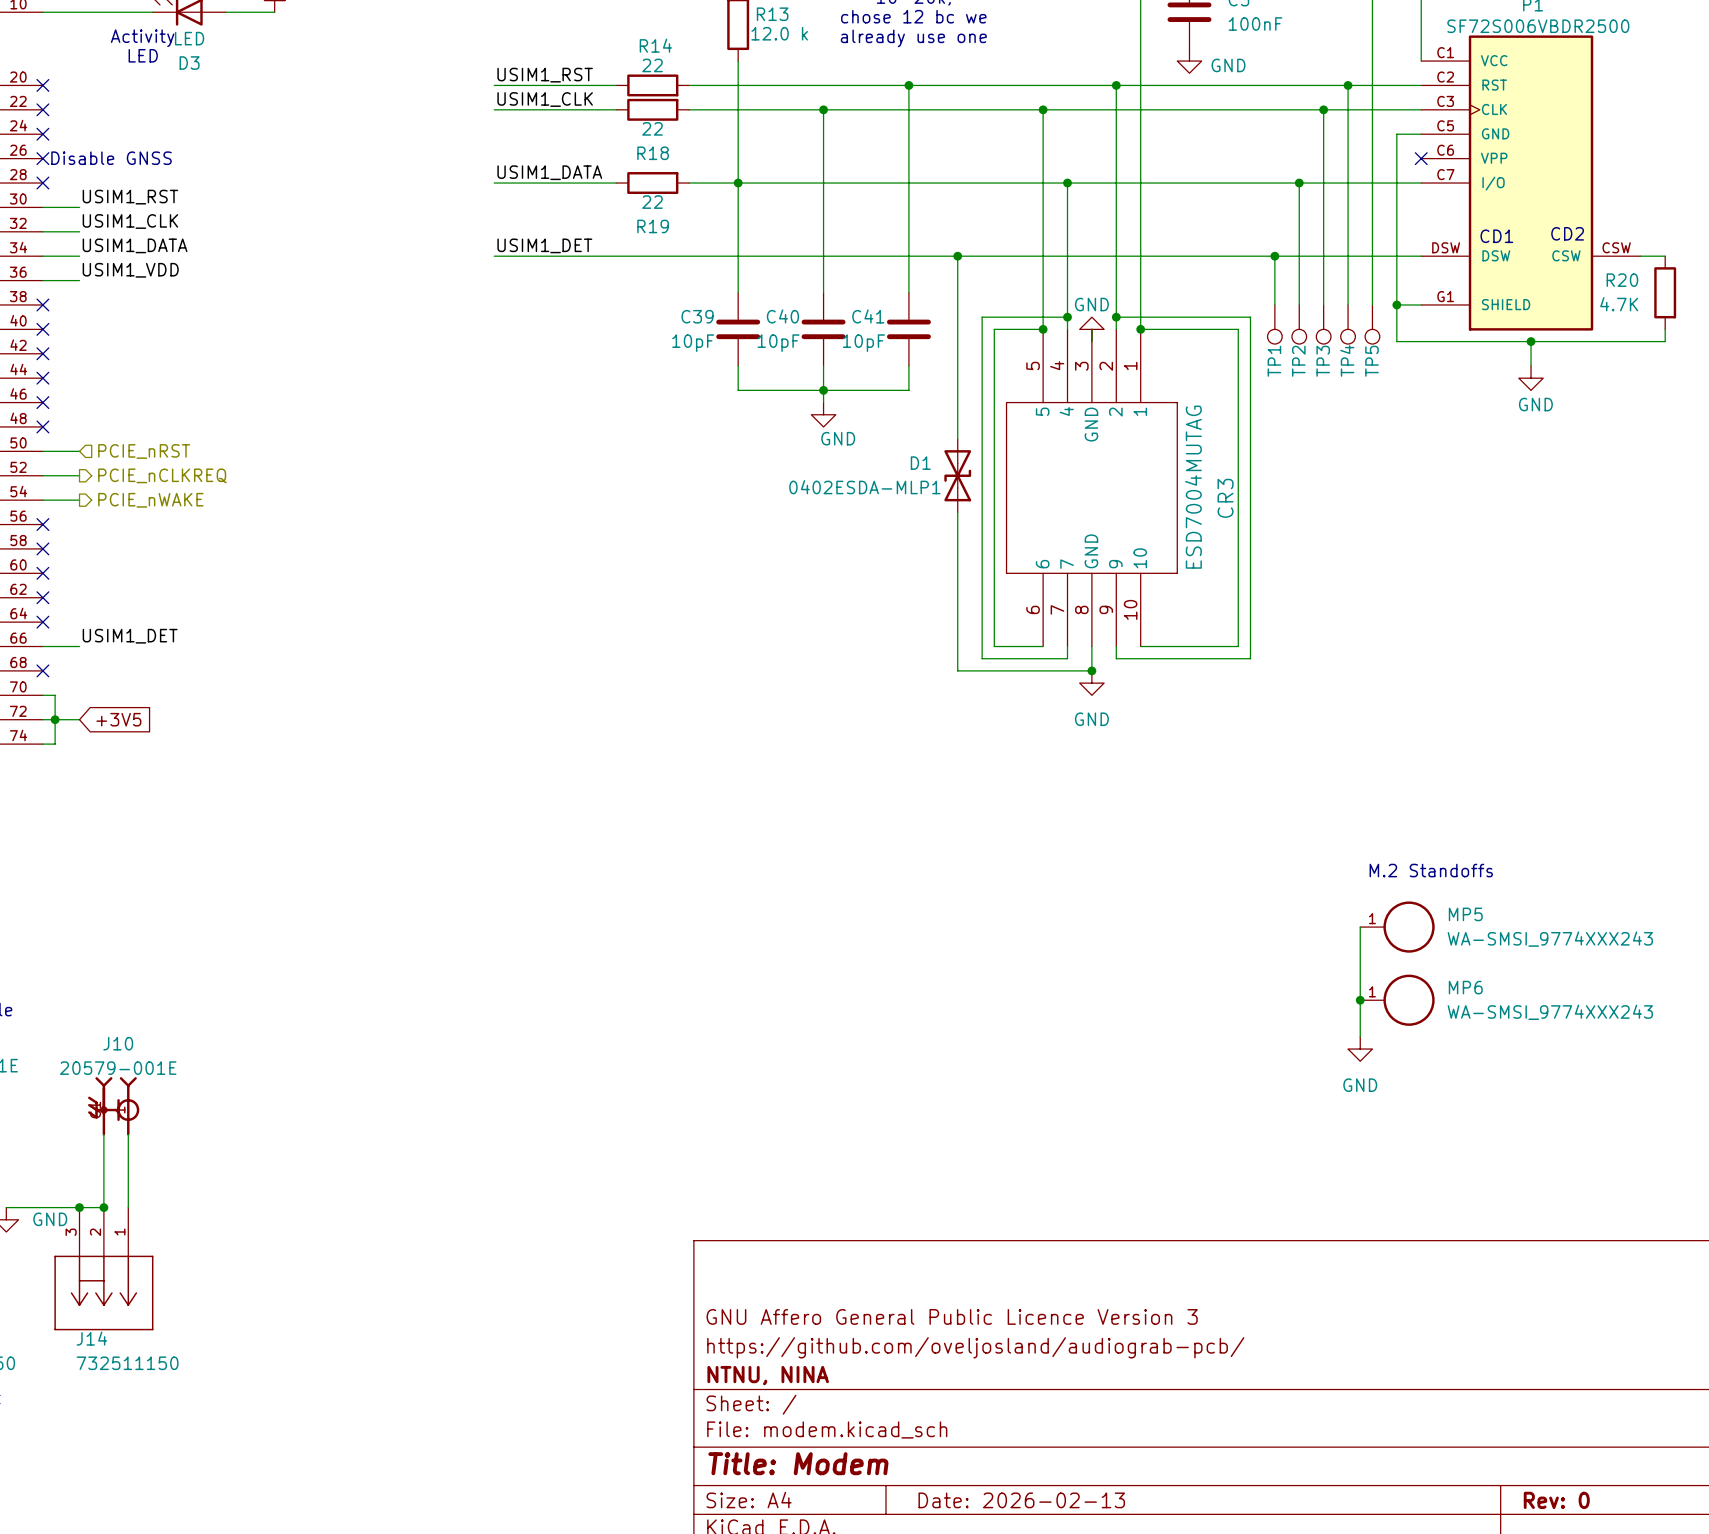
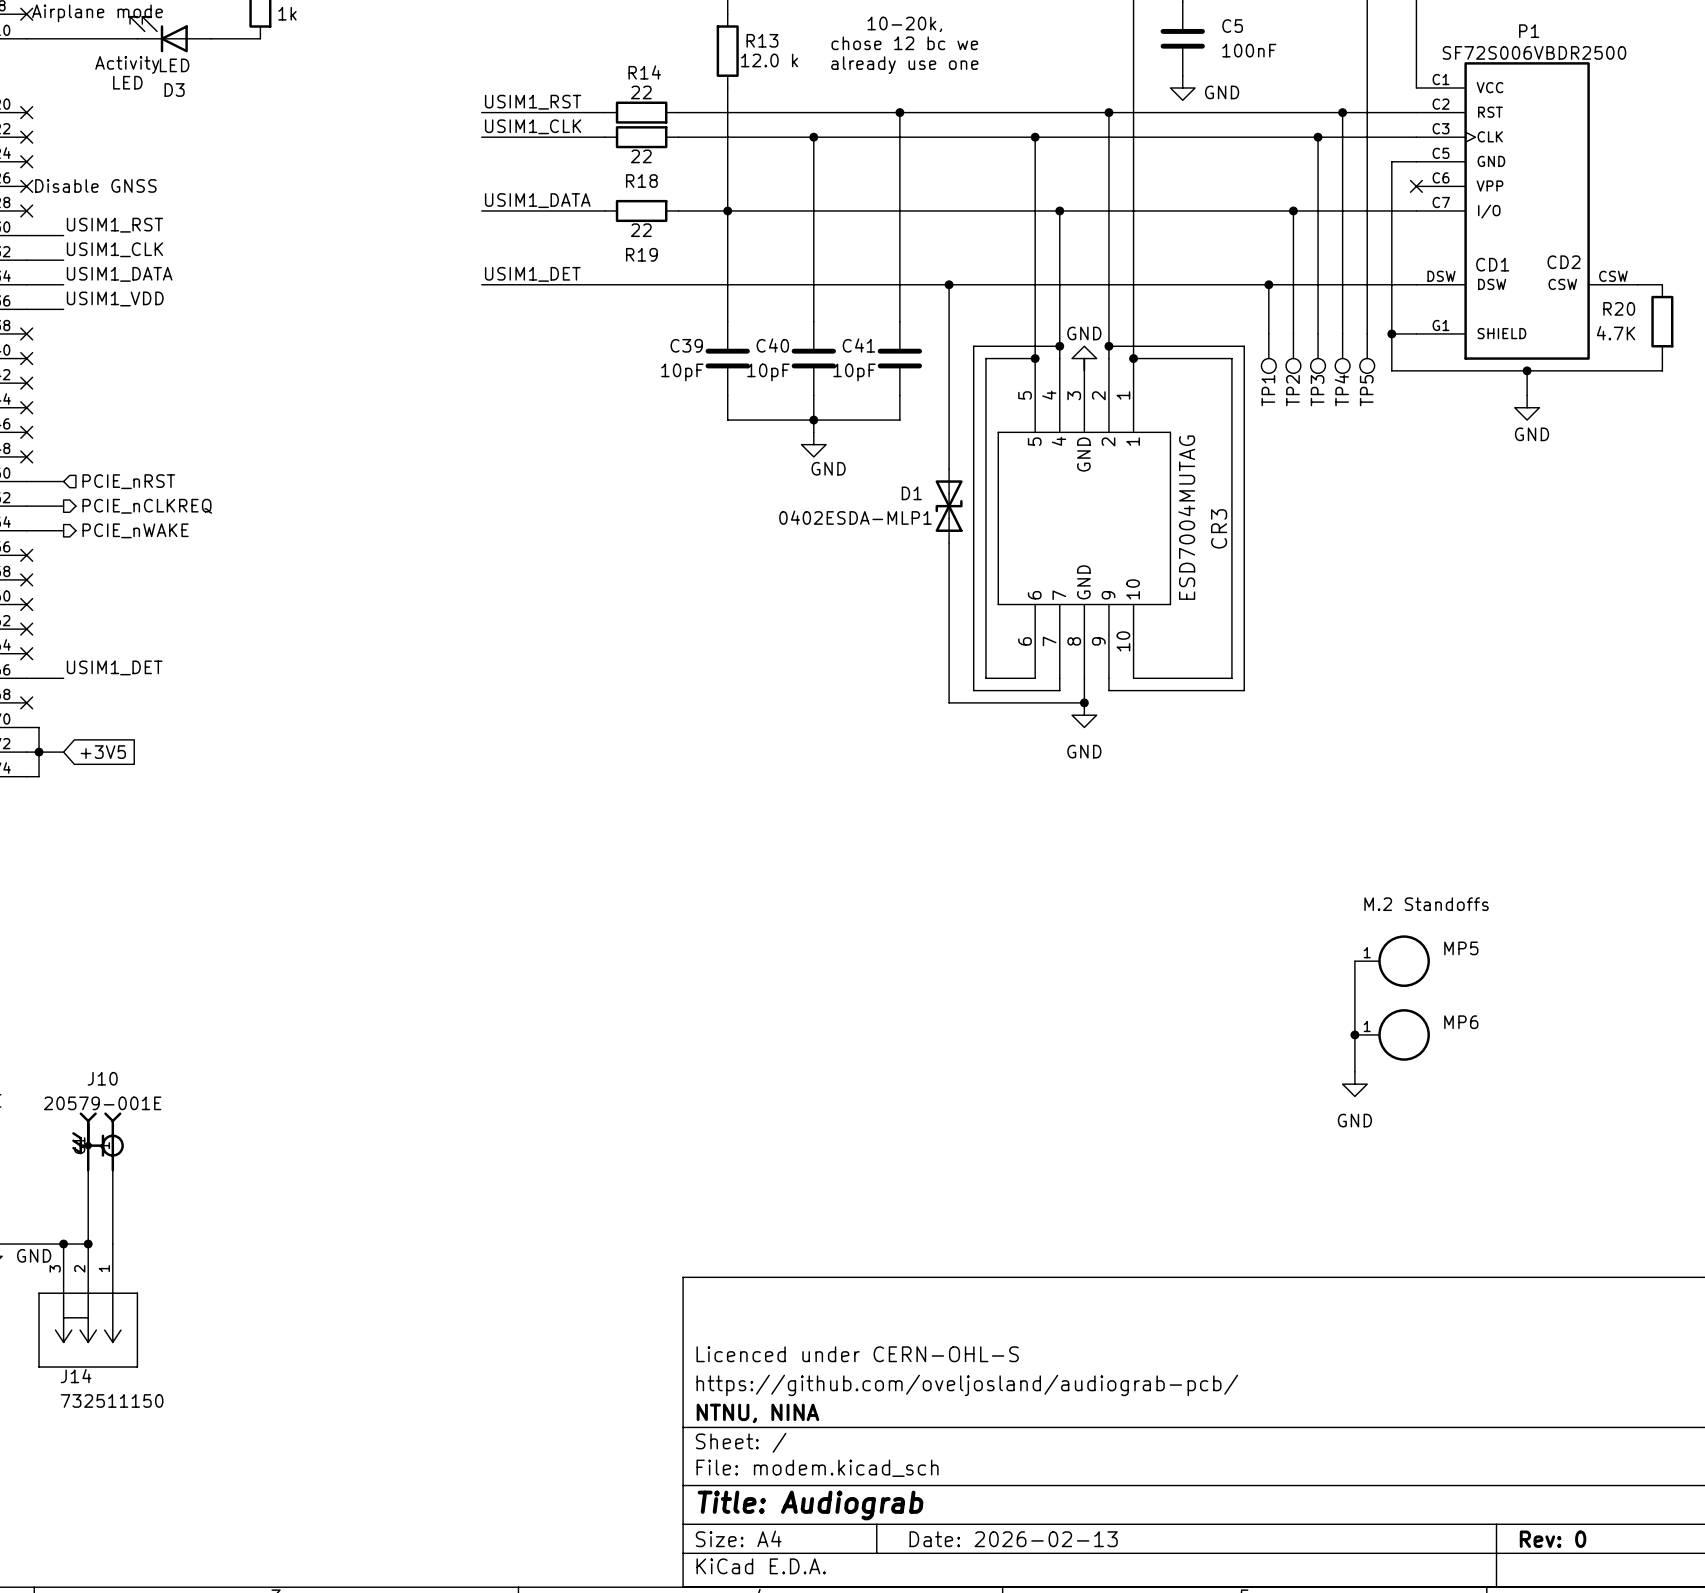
MP5 value: WA-SMSI_9774XXX243 (1550, 939) -> none
MP6 value: WA-SMSI_9774XXX243 (1550, 1012) -> none
title block: GNU Affero General Public Licence Version 3 (952, 1316) -> Licenced under CERN-OHL-S (857, 1354)
title block: Title: Modem (798, 1463) -> Title: Audiograb (810, 1505)

